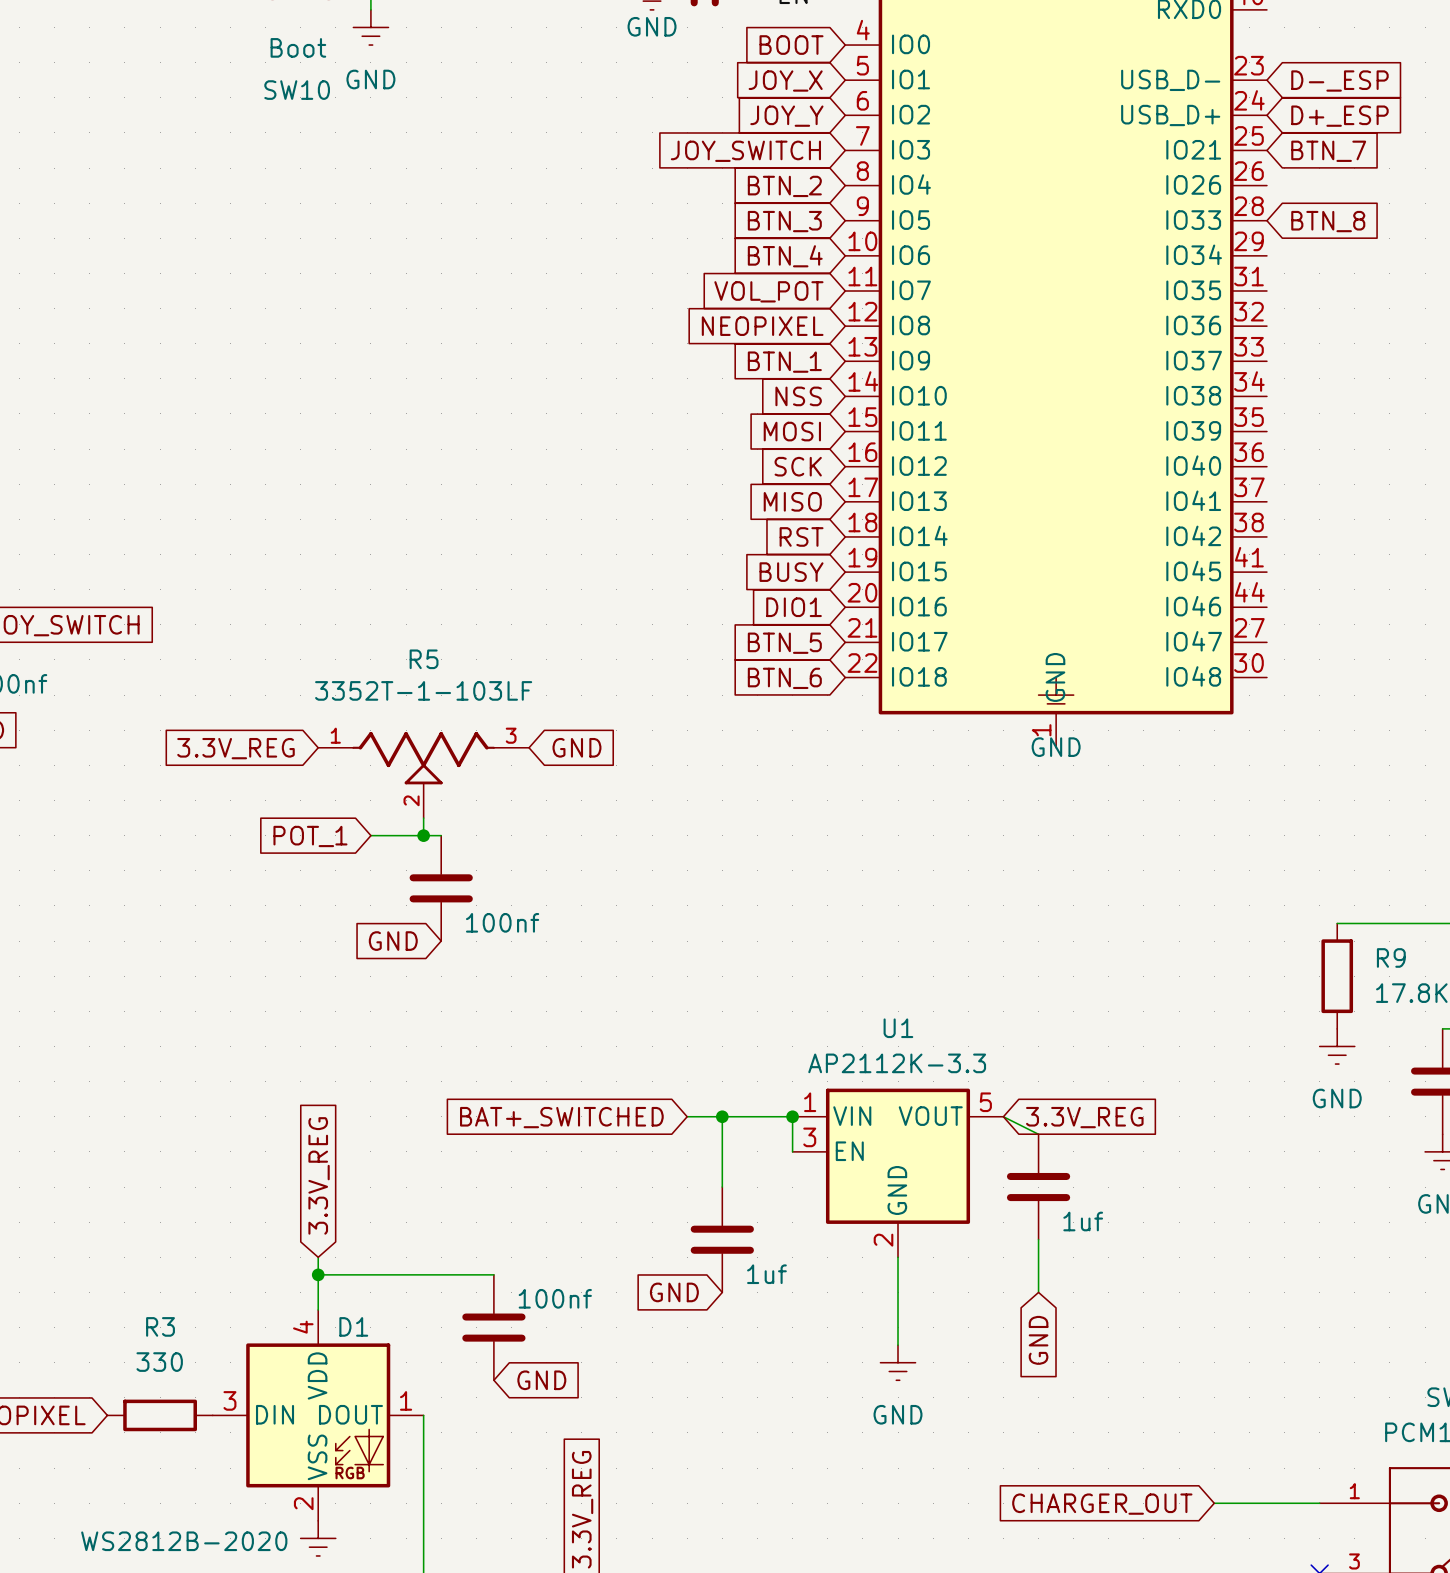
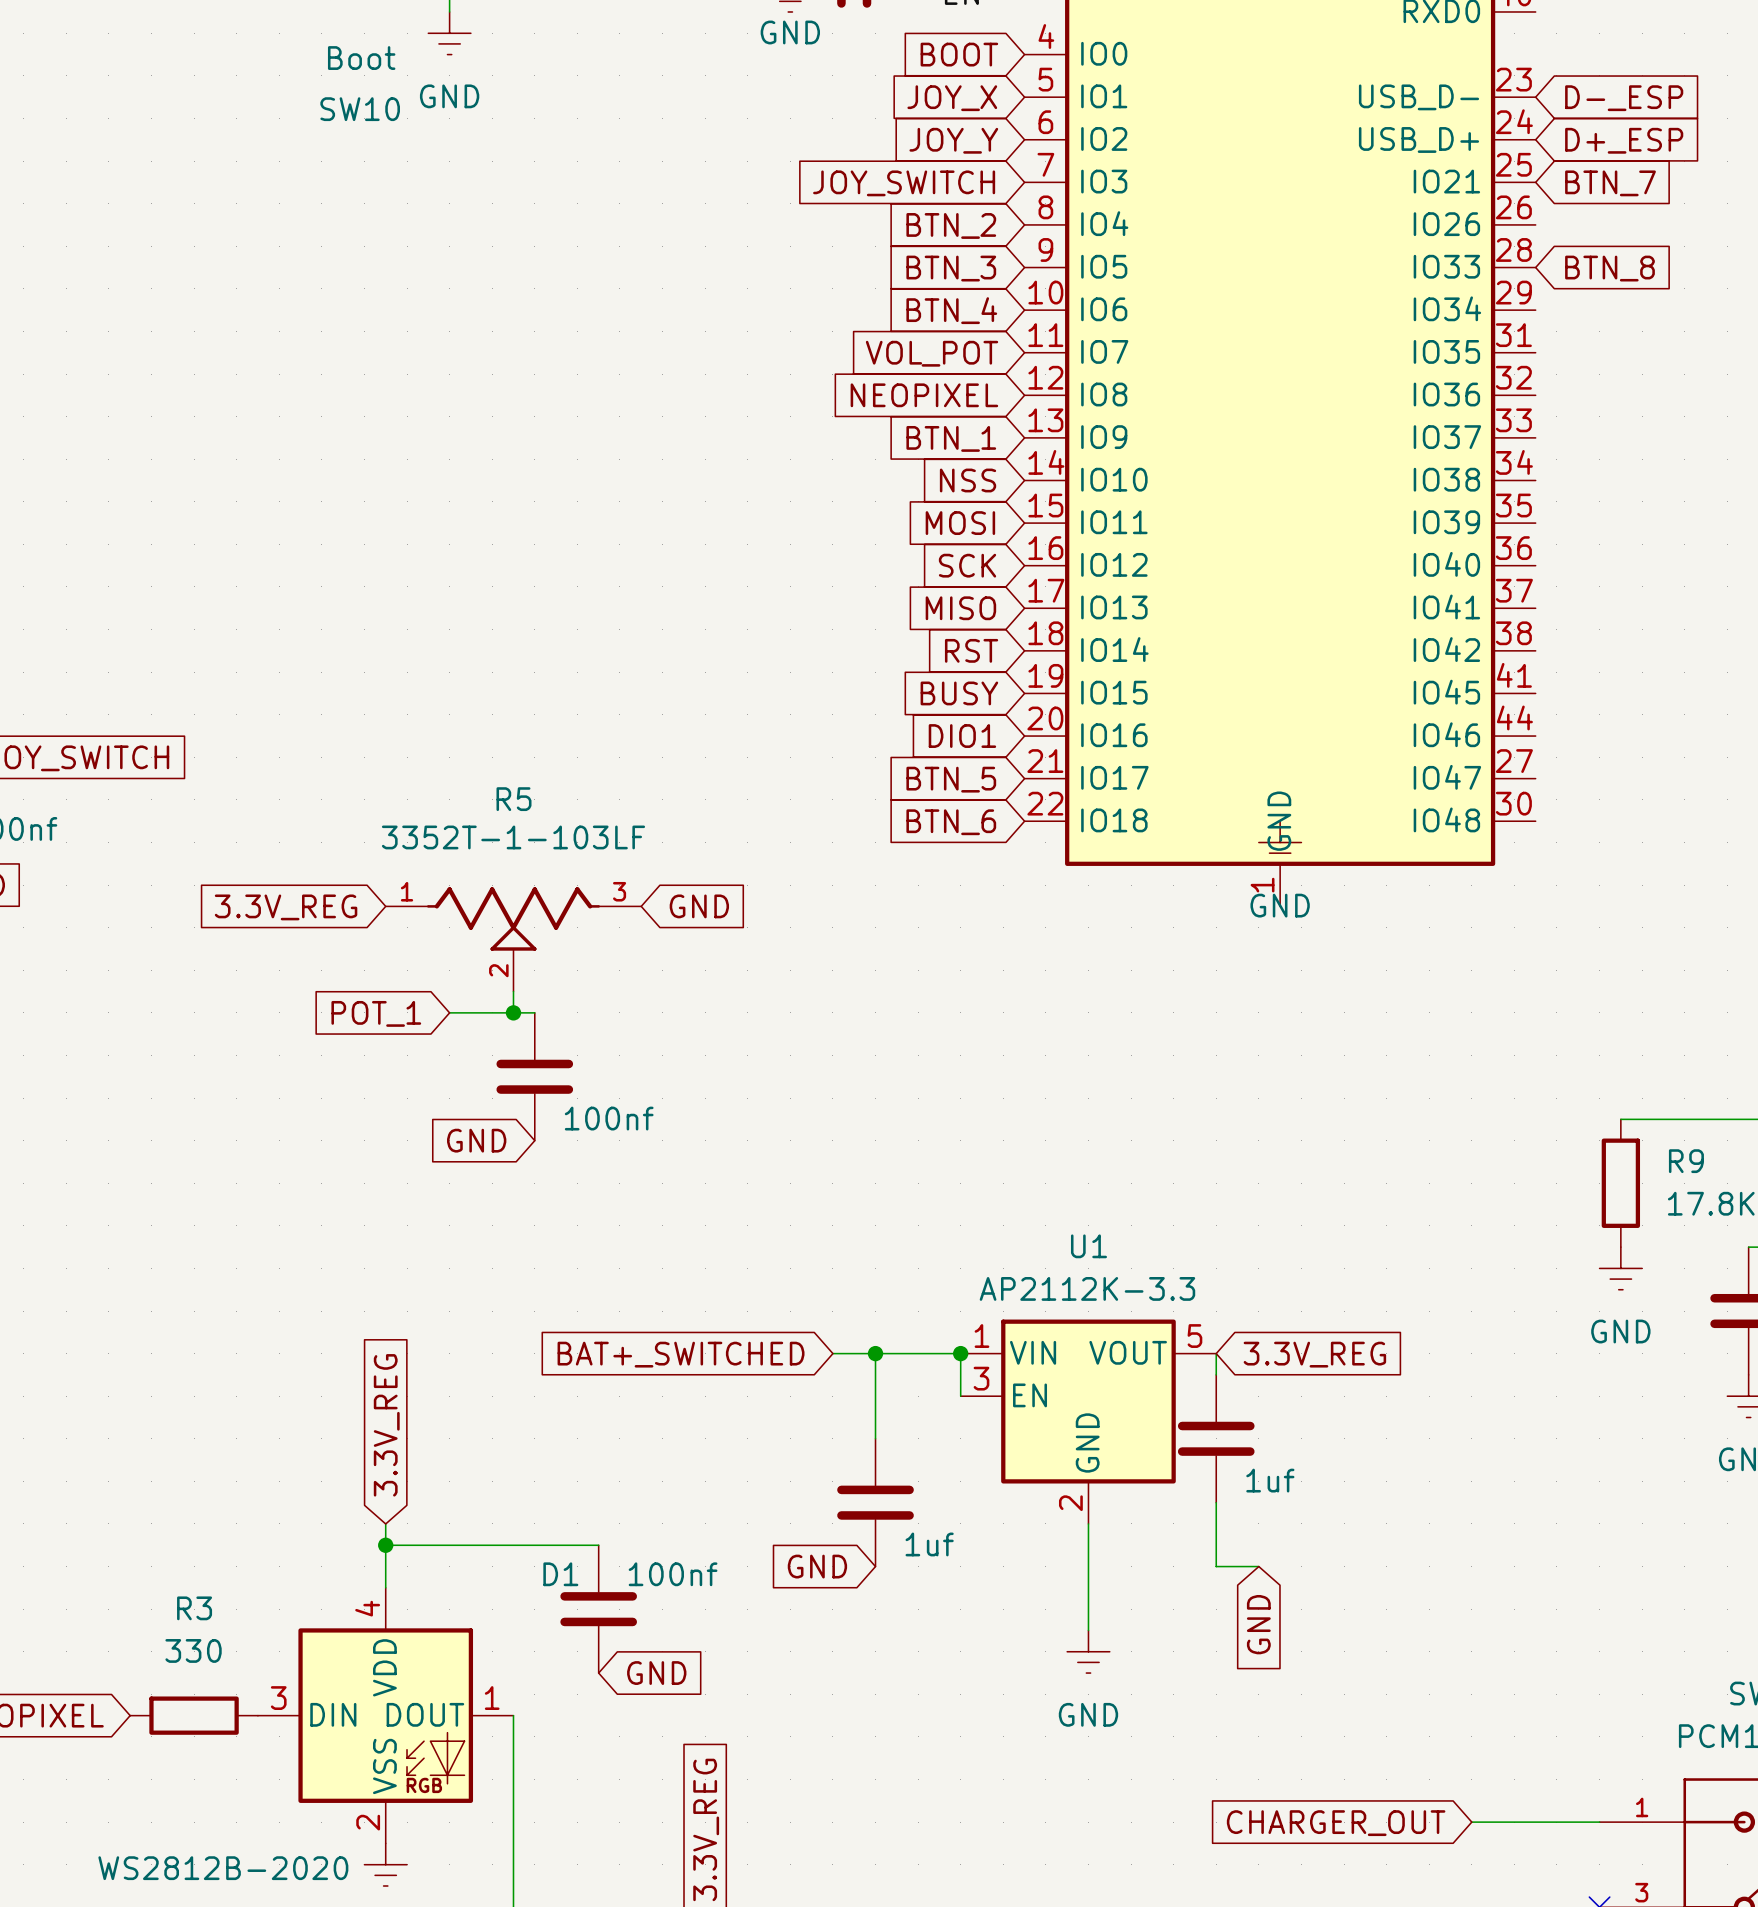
wire: (1003, 1116) (1038, 1134) -> (1216, 1353) (1216, 1374)
part position: (1038, 1187) -> (1216, 1438)
wire: (1038, 1239) (1038, 1292) -> (1216, 1502) (1216, 1566) (1258, 1566)
D1 name position: D1 (353, 1326) -> D1 (560, 1574)

